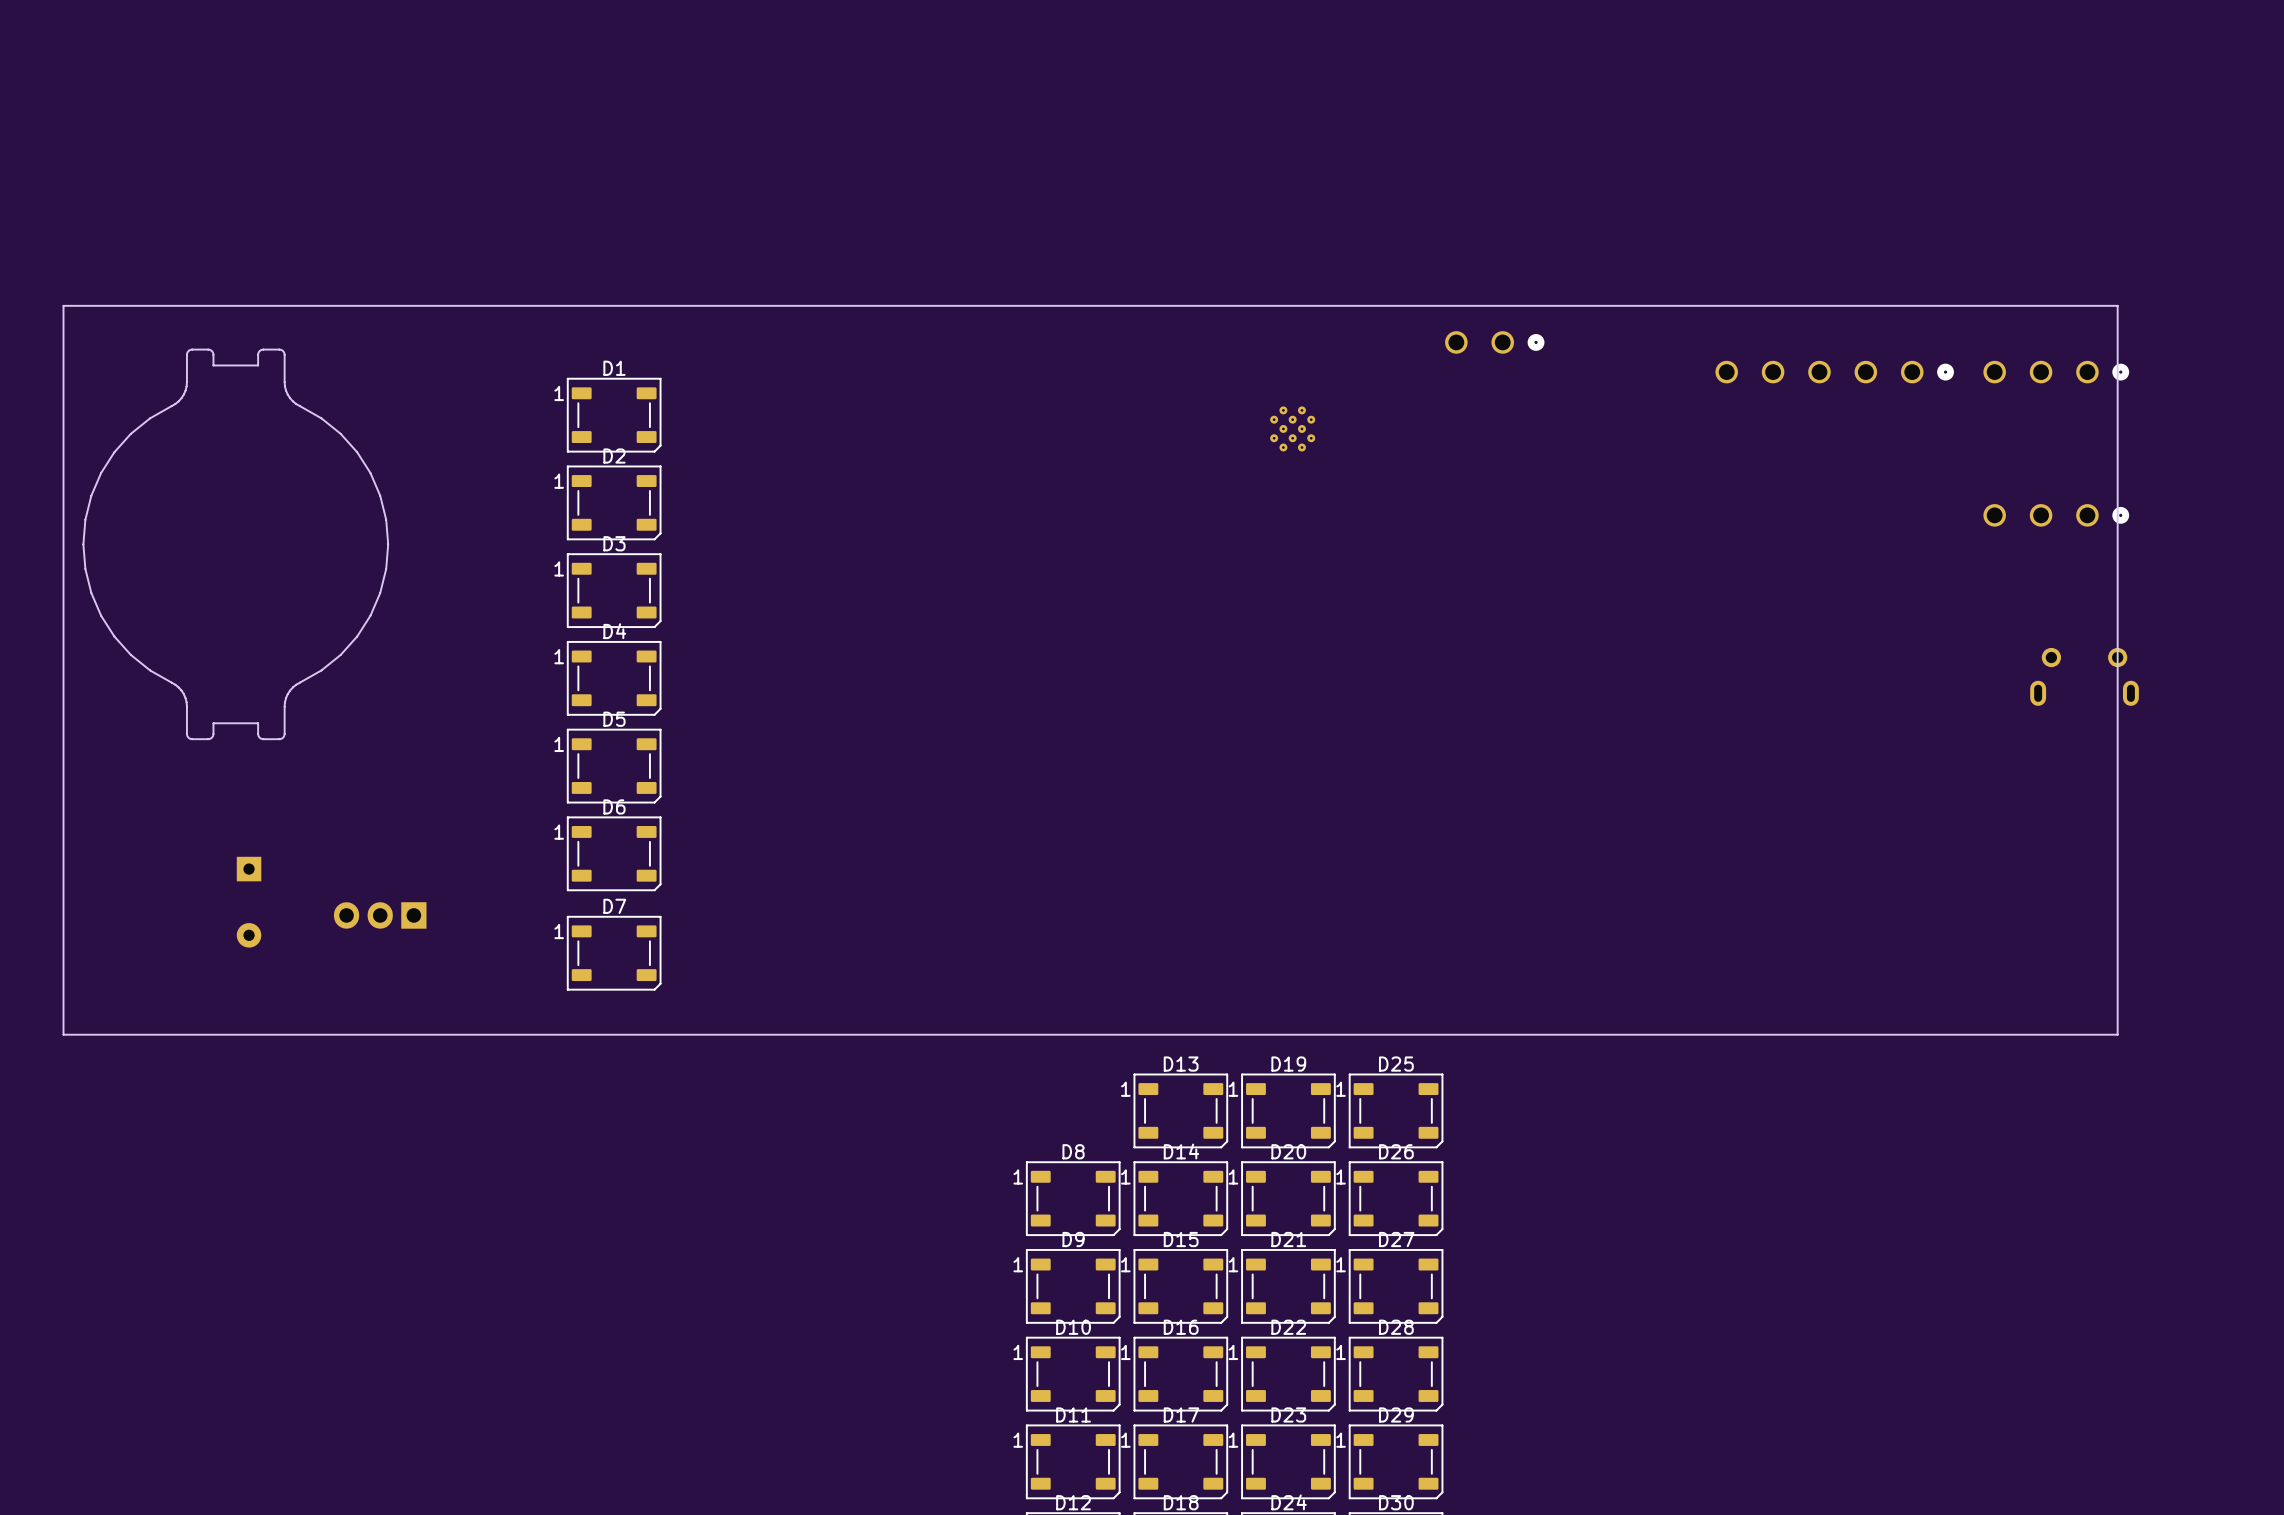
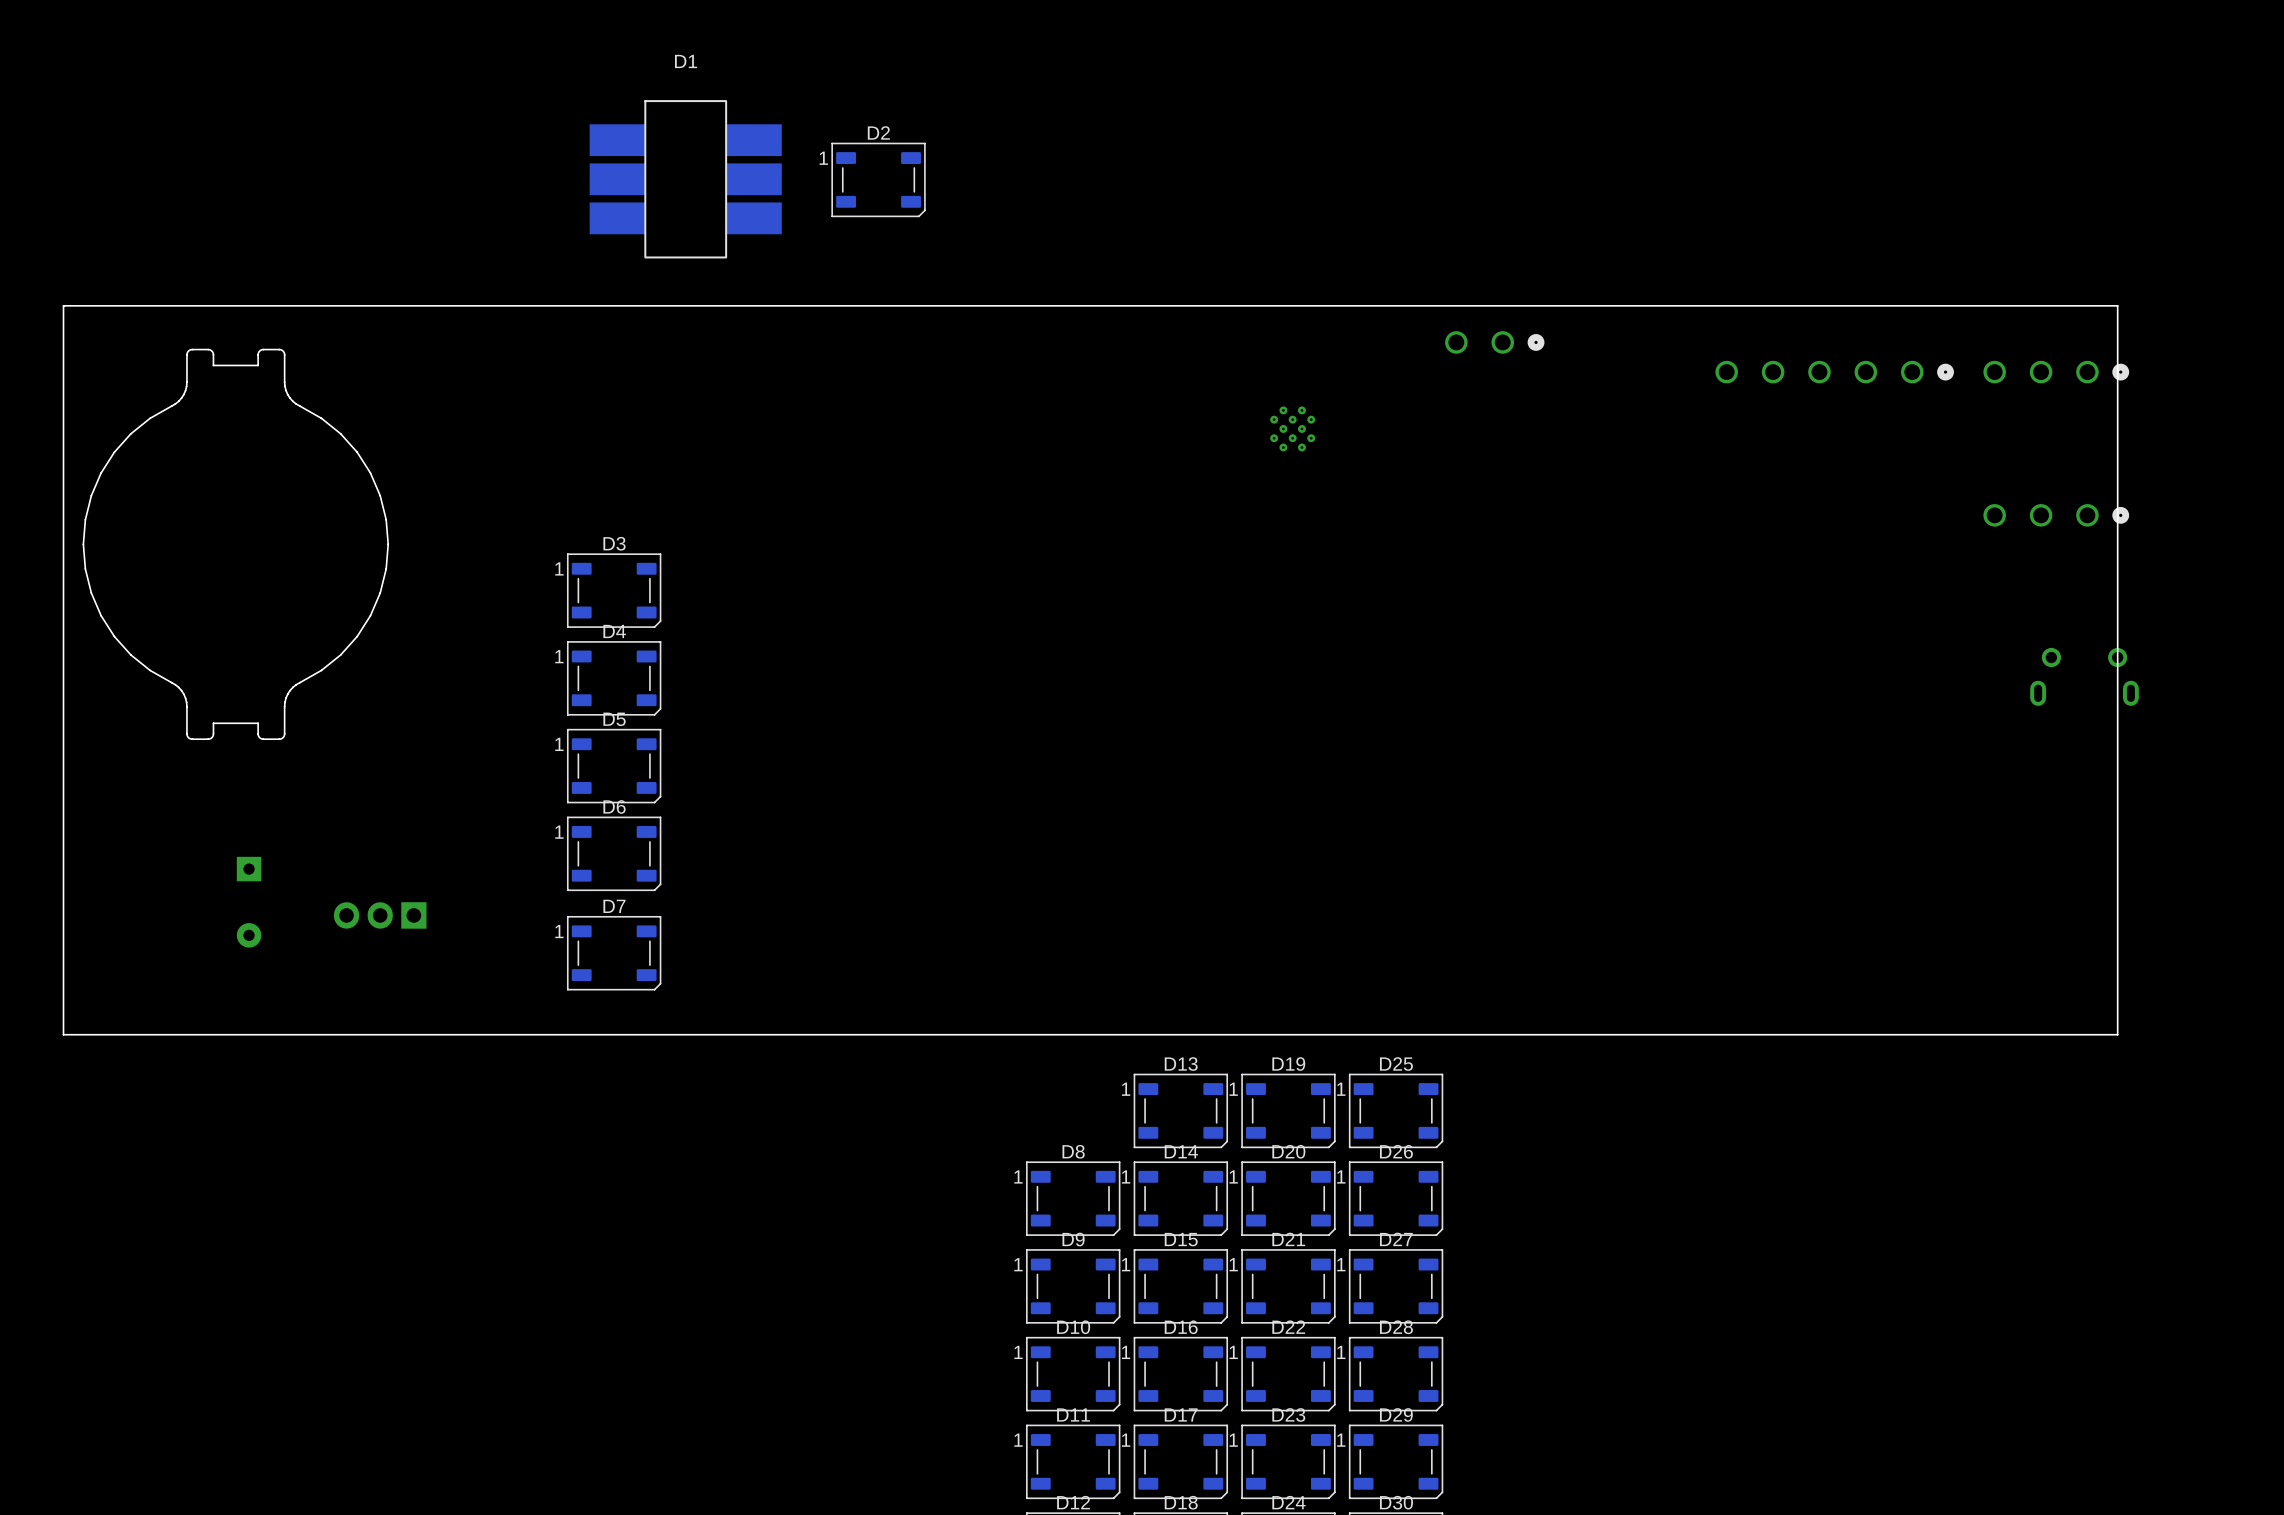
D1 name position: D1 (614, 368) -> D1 (686, 61)
D1 footprint: [566, 377, 662, 453] -> [589, 100, 782, 259]
D2 position: (614, 502) -> (878, 179)

